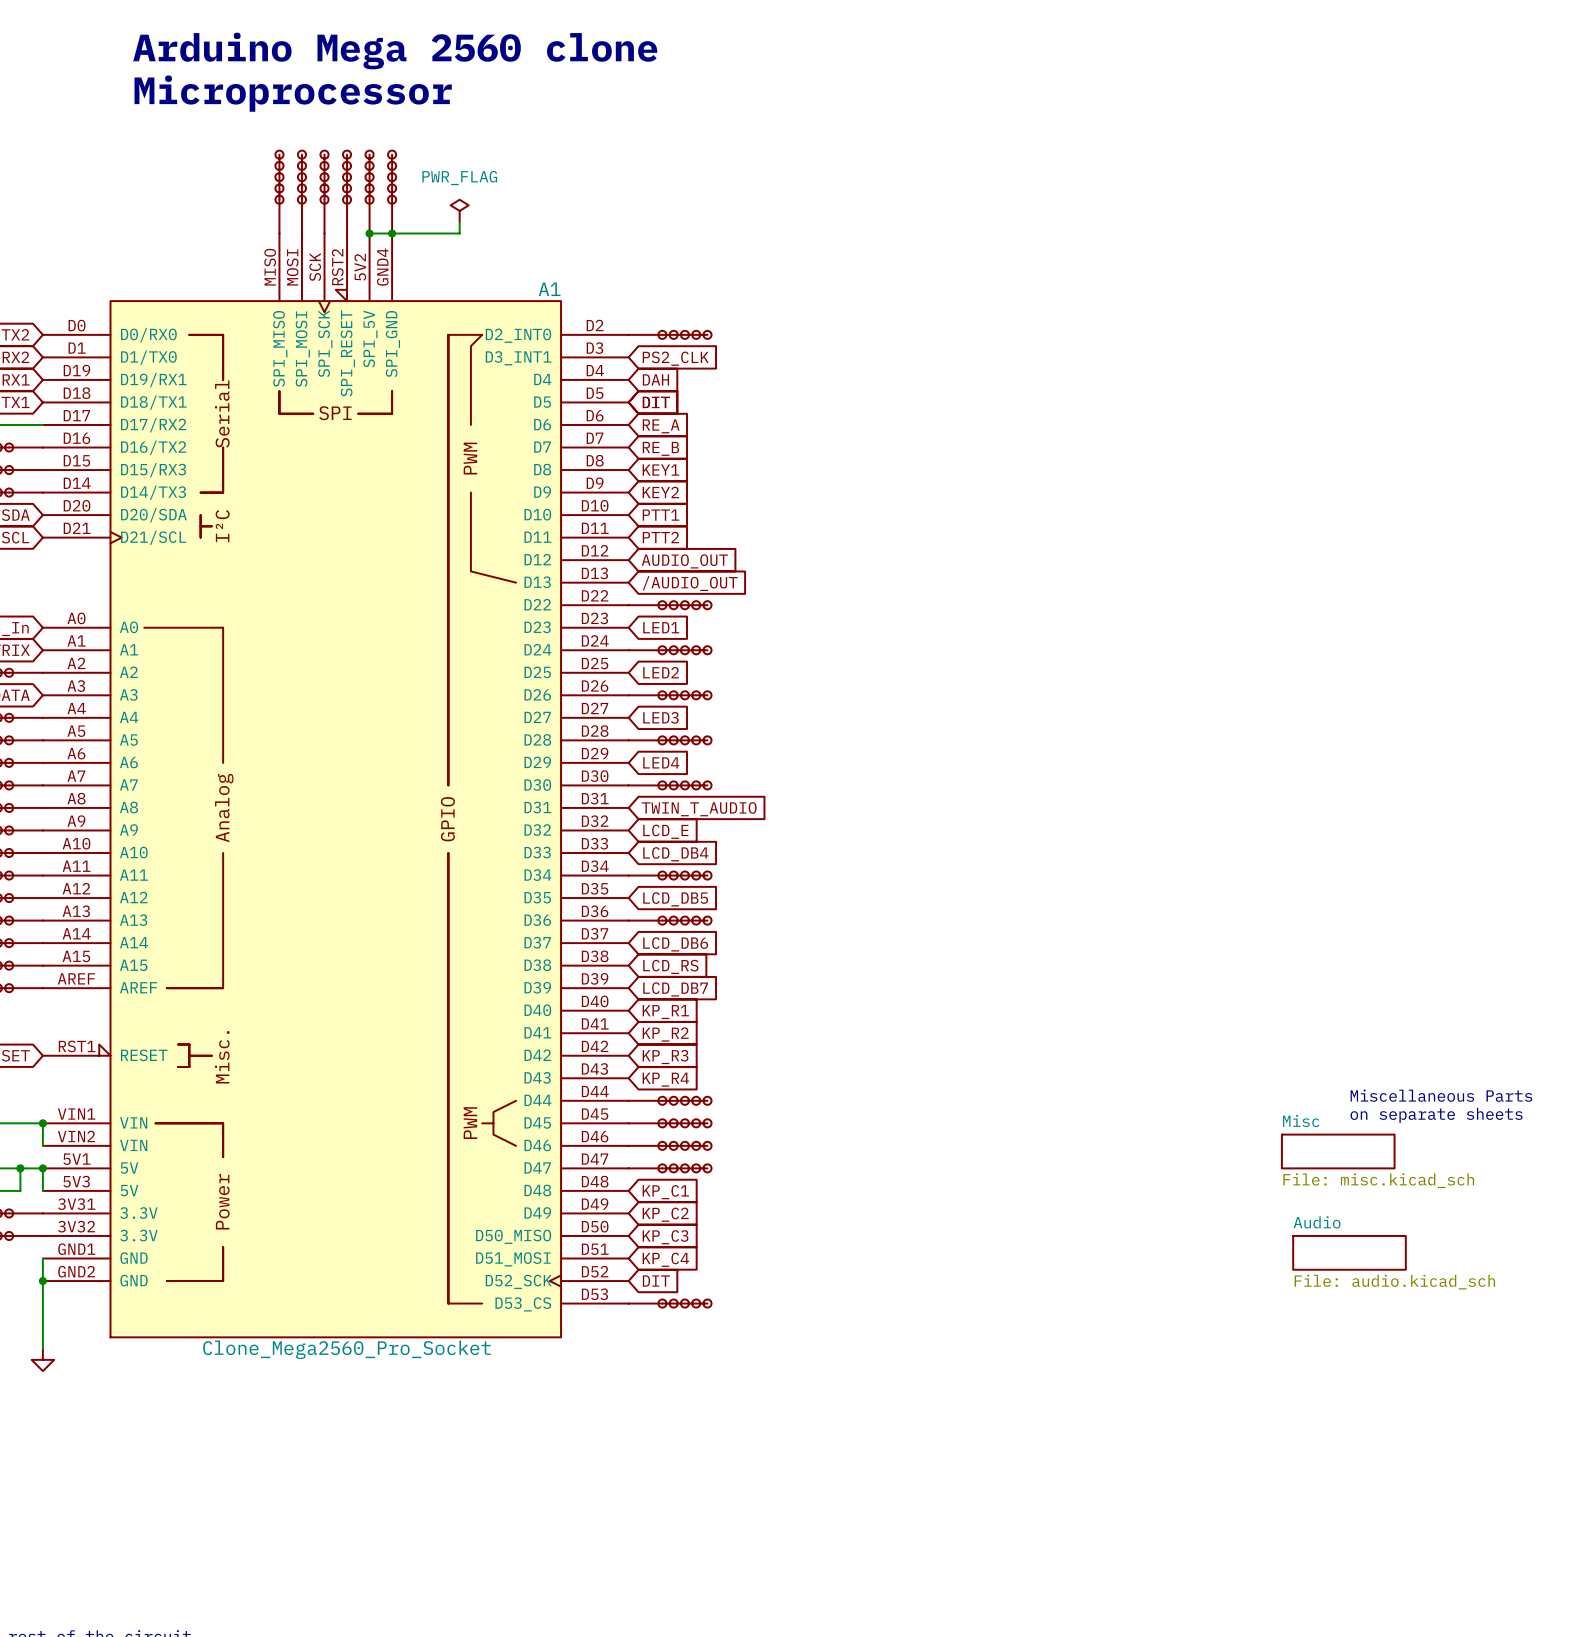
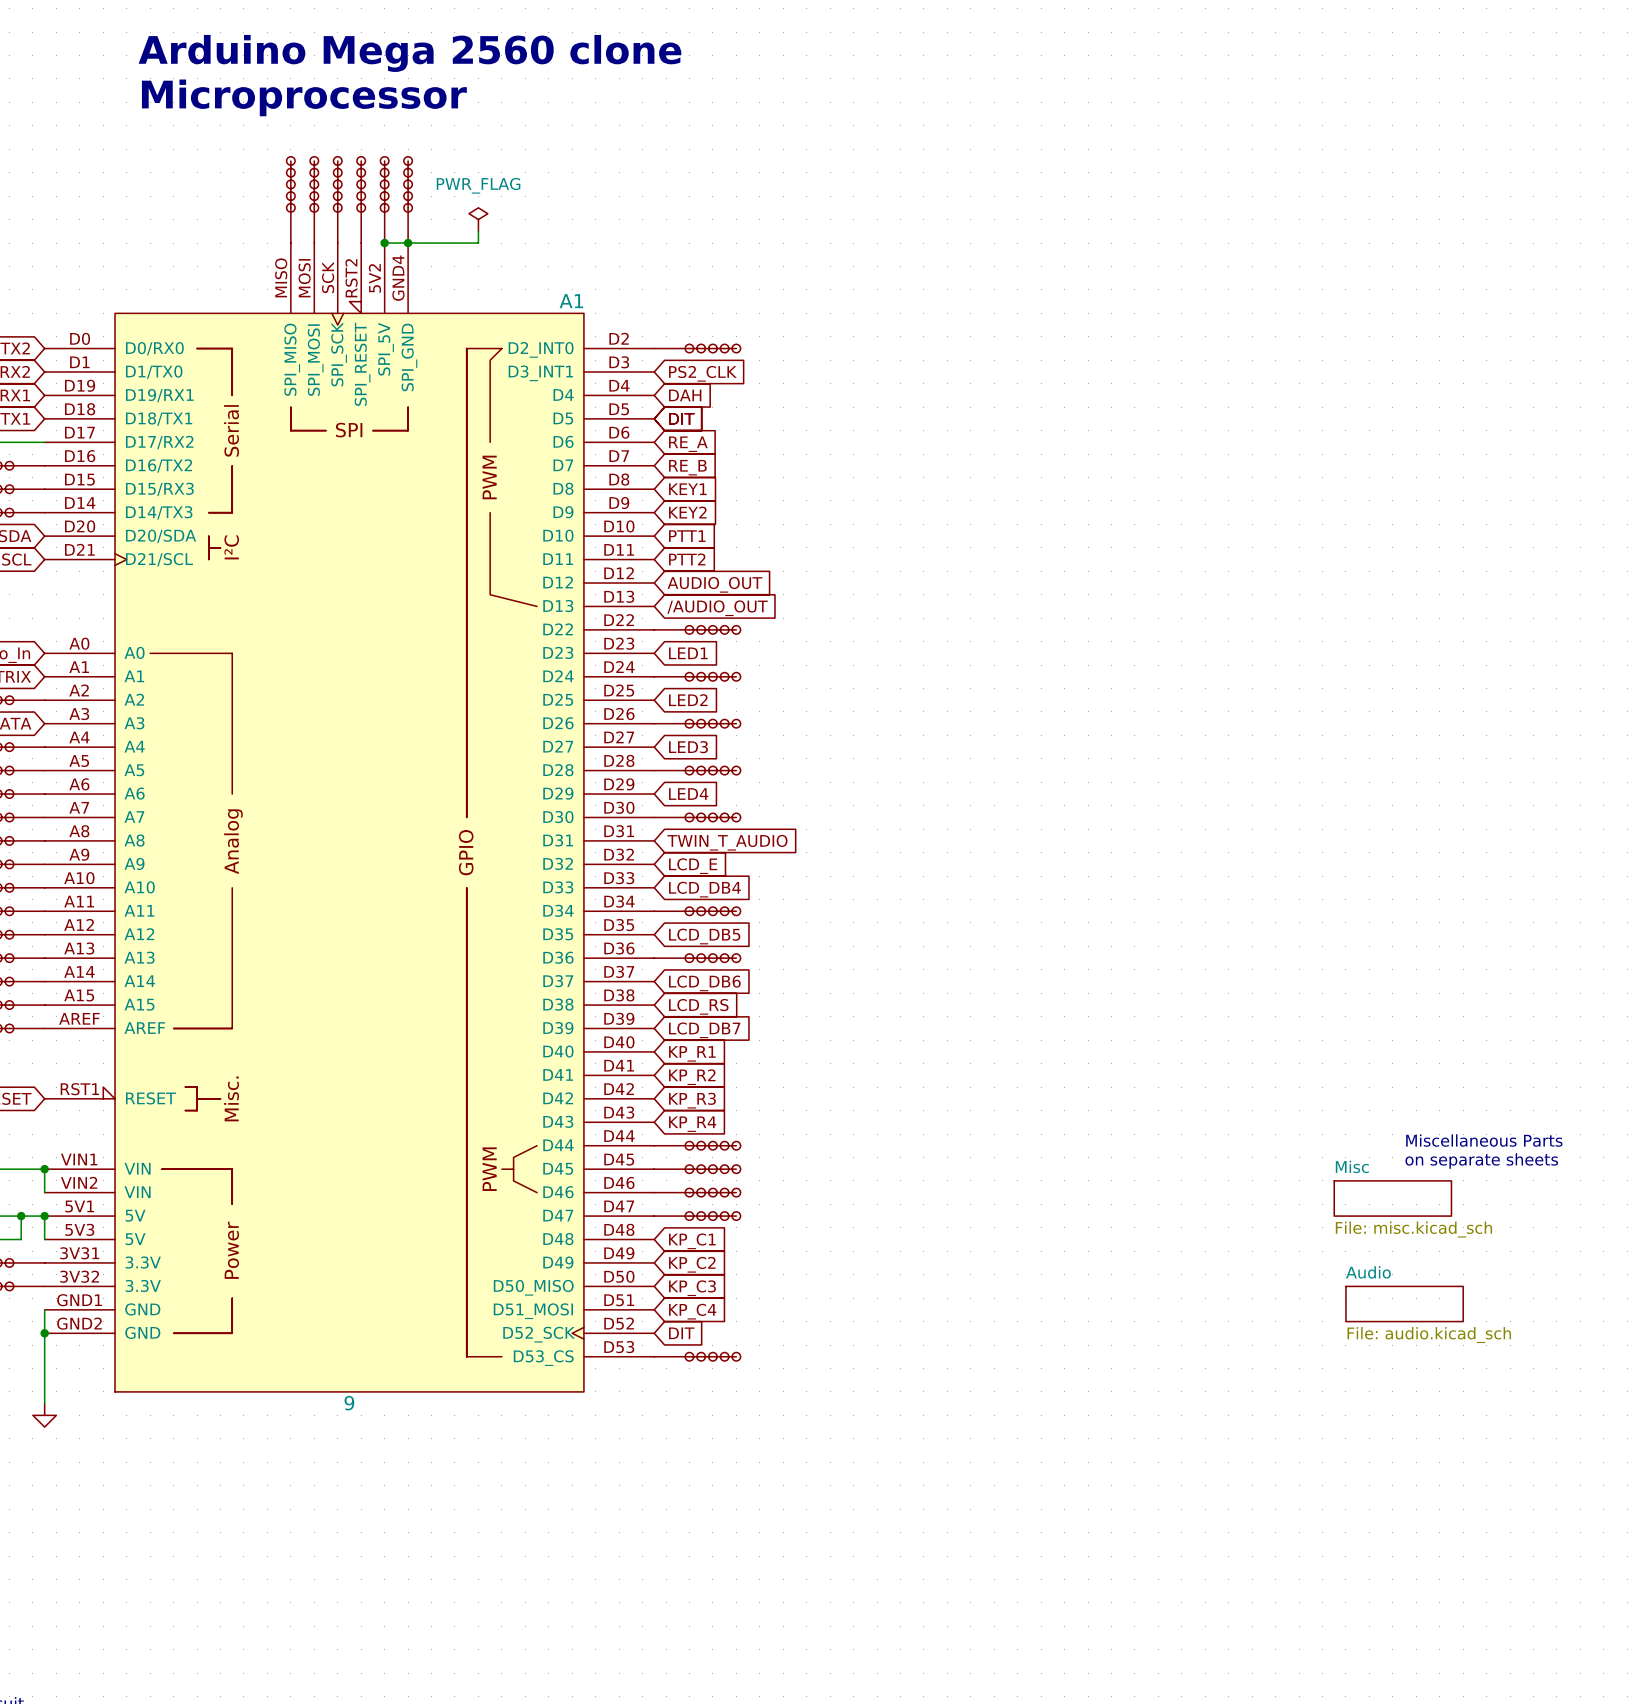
A1 value: Clone_Mega2560_Pro_Socket (346, 1349) -> 9 (349, 1403)

